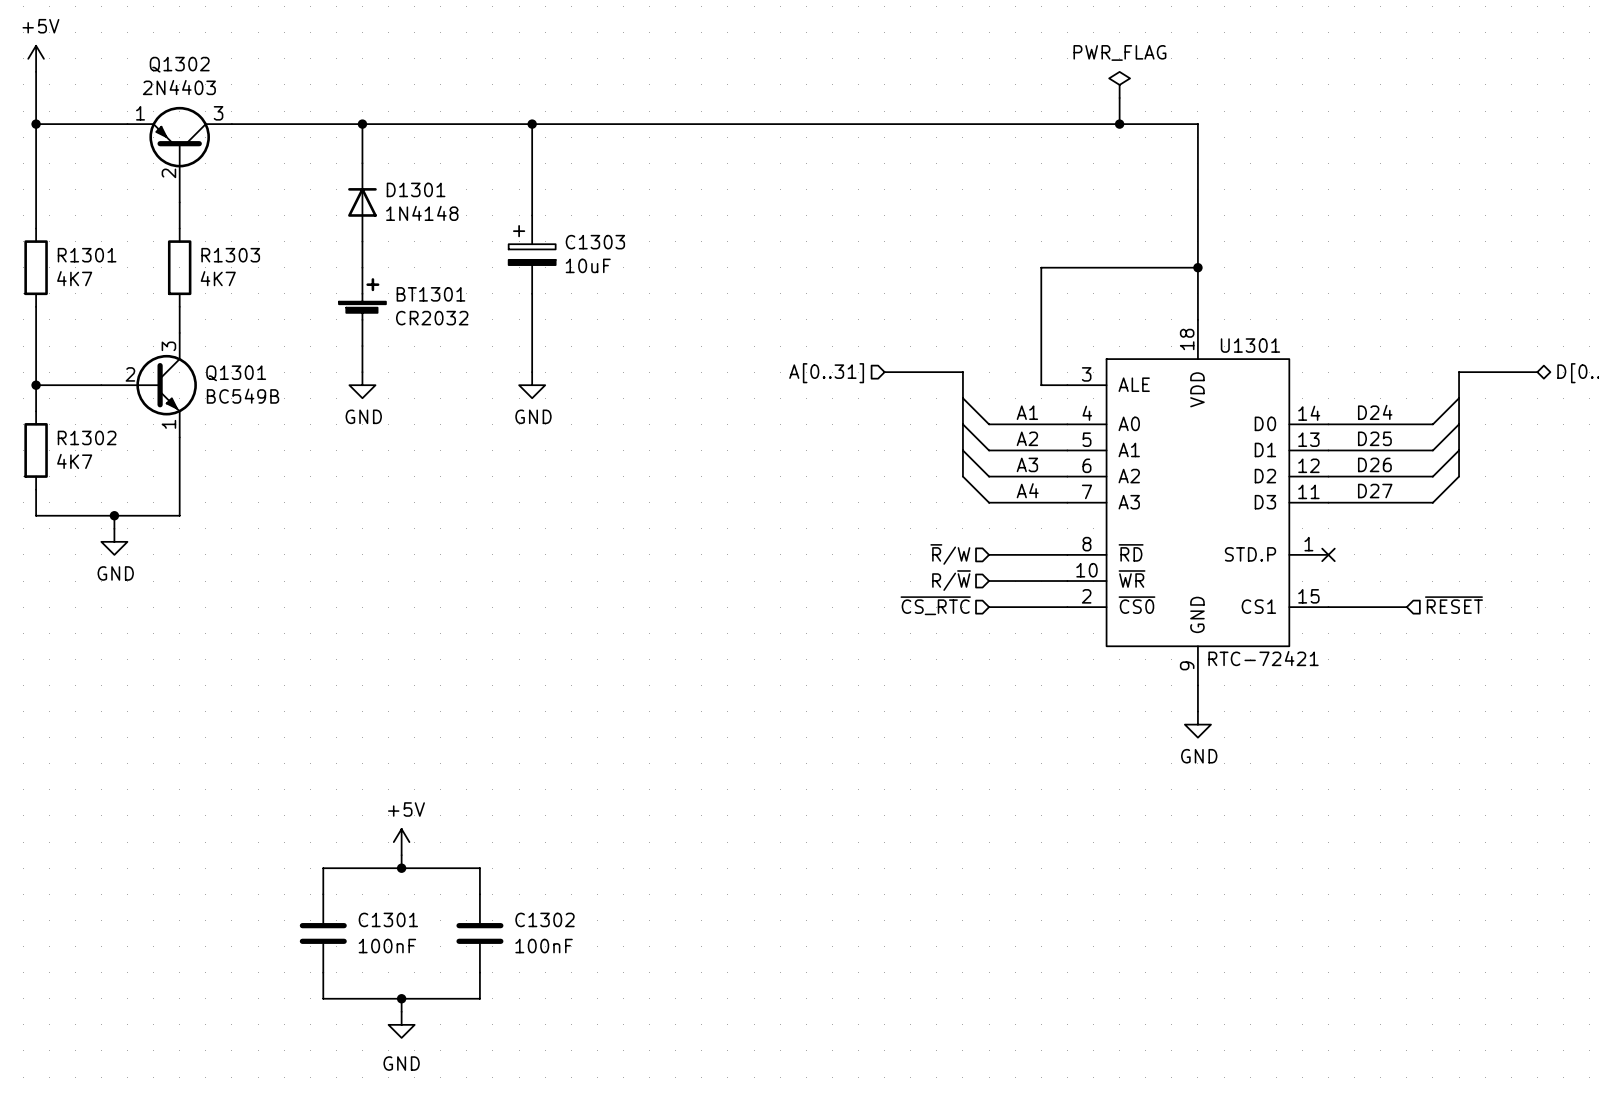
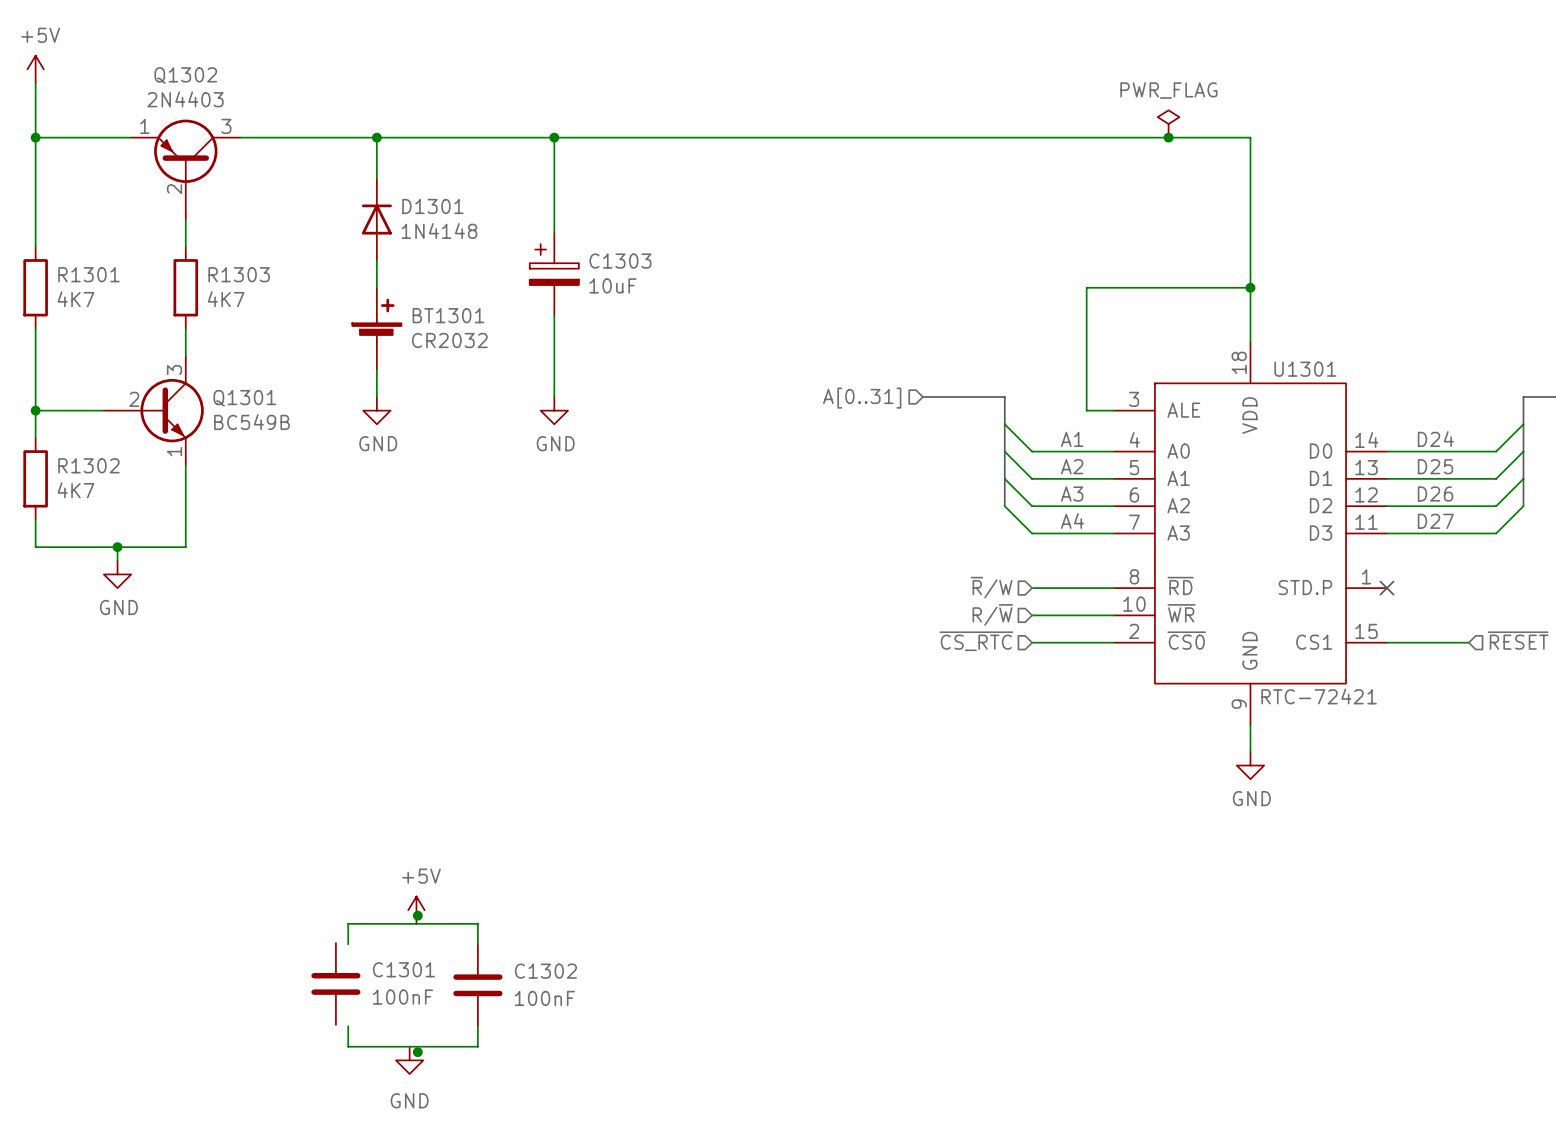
power symbol position: PWR_FLAG (1119, 84) -> PWR_FLAG (1168, 123)
power symbol position: +5V (401, 842) -> +5V (416, 910)
wire: (323, 894) (323, 868) (479, 868) (479, 894) -> none
wire: none -> (348, 944) (348, 923) (477, 923) (477, 944)
C1302 position: (479, 933) -> (477, 985)
wire: (323, 972) (323, 998) (479, 998) (479, 972) -> none
wire: none -> (348, 1026) (348, 1046) (477, 1046) (477, 1026)
power symbol position: GND (401, 1024) -> GND (409, 1060)

